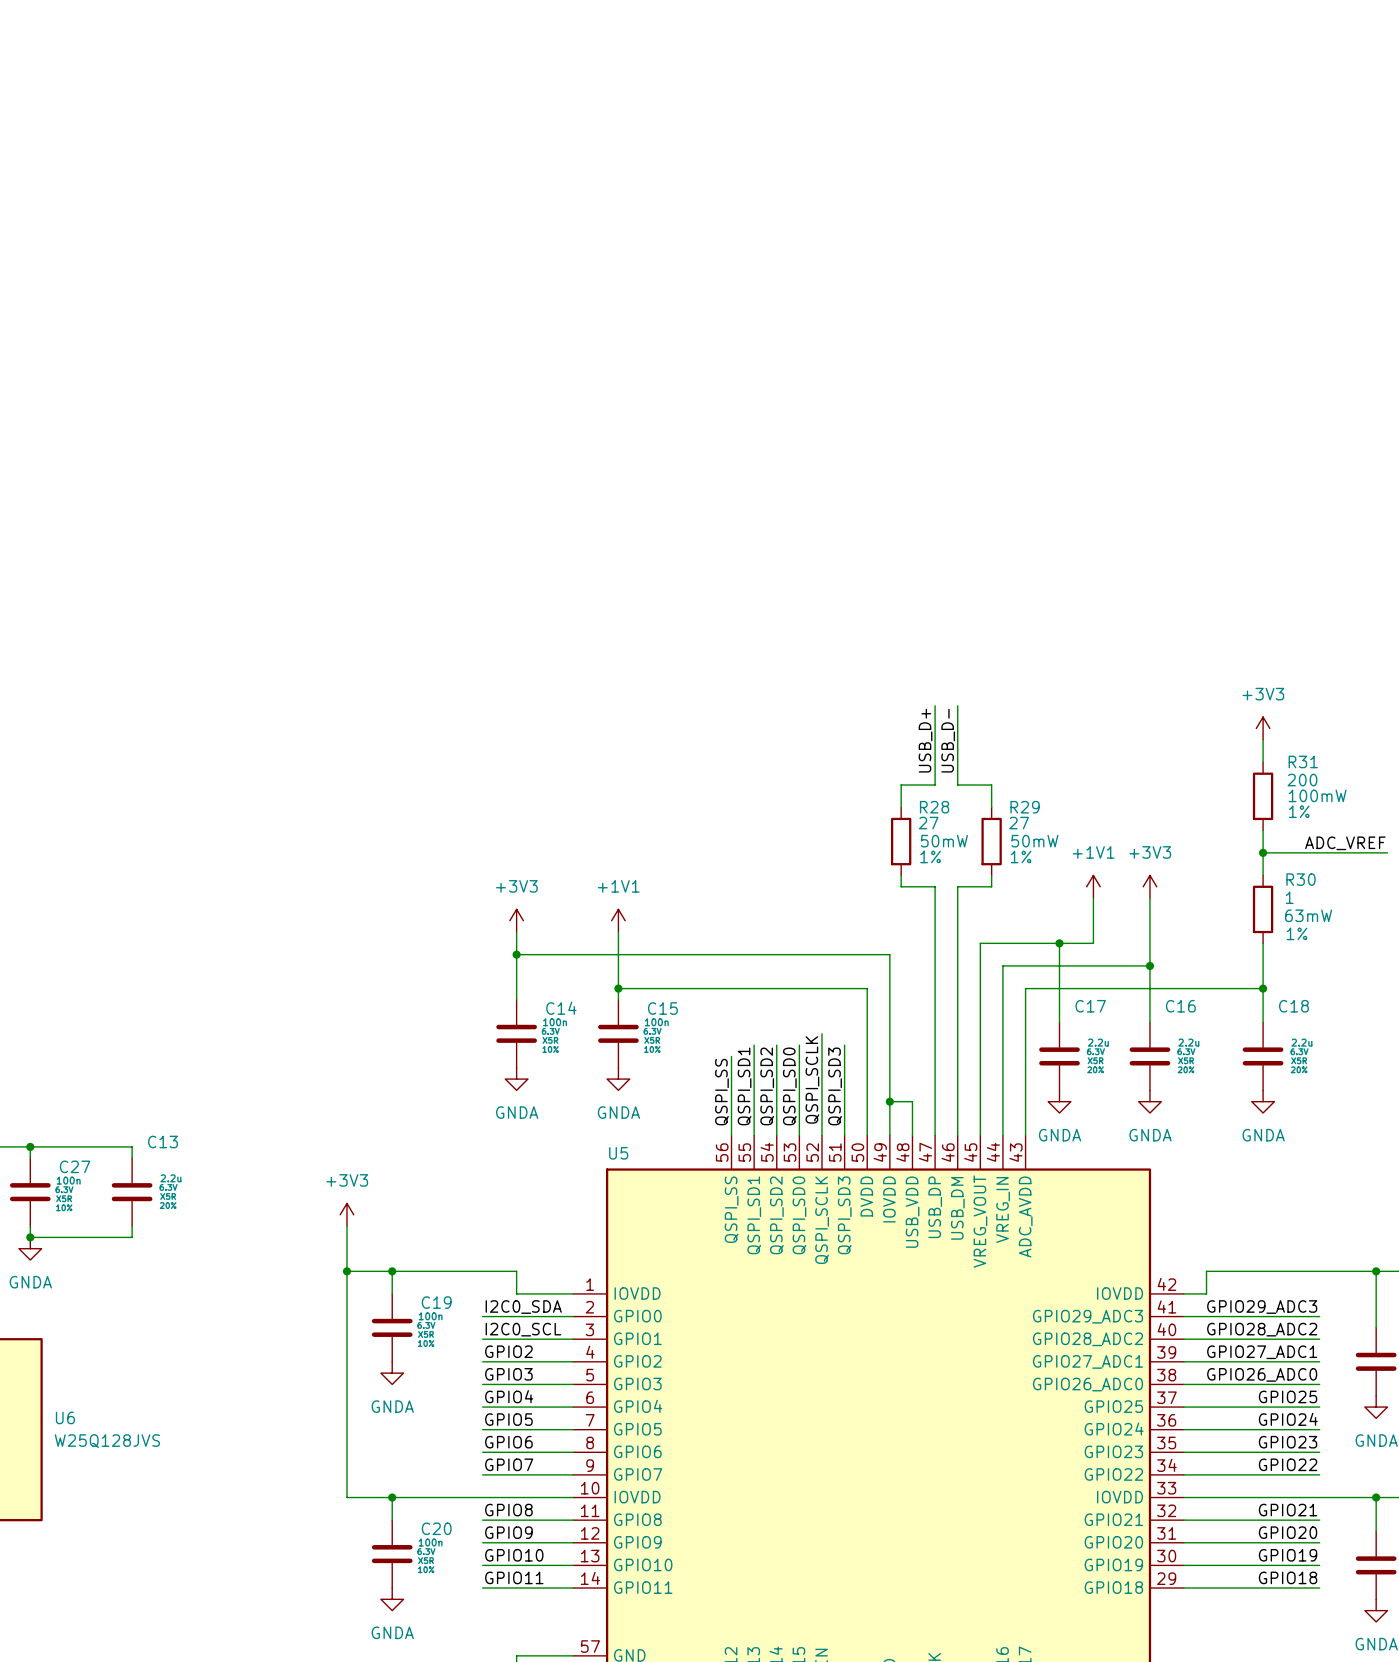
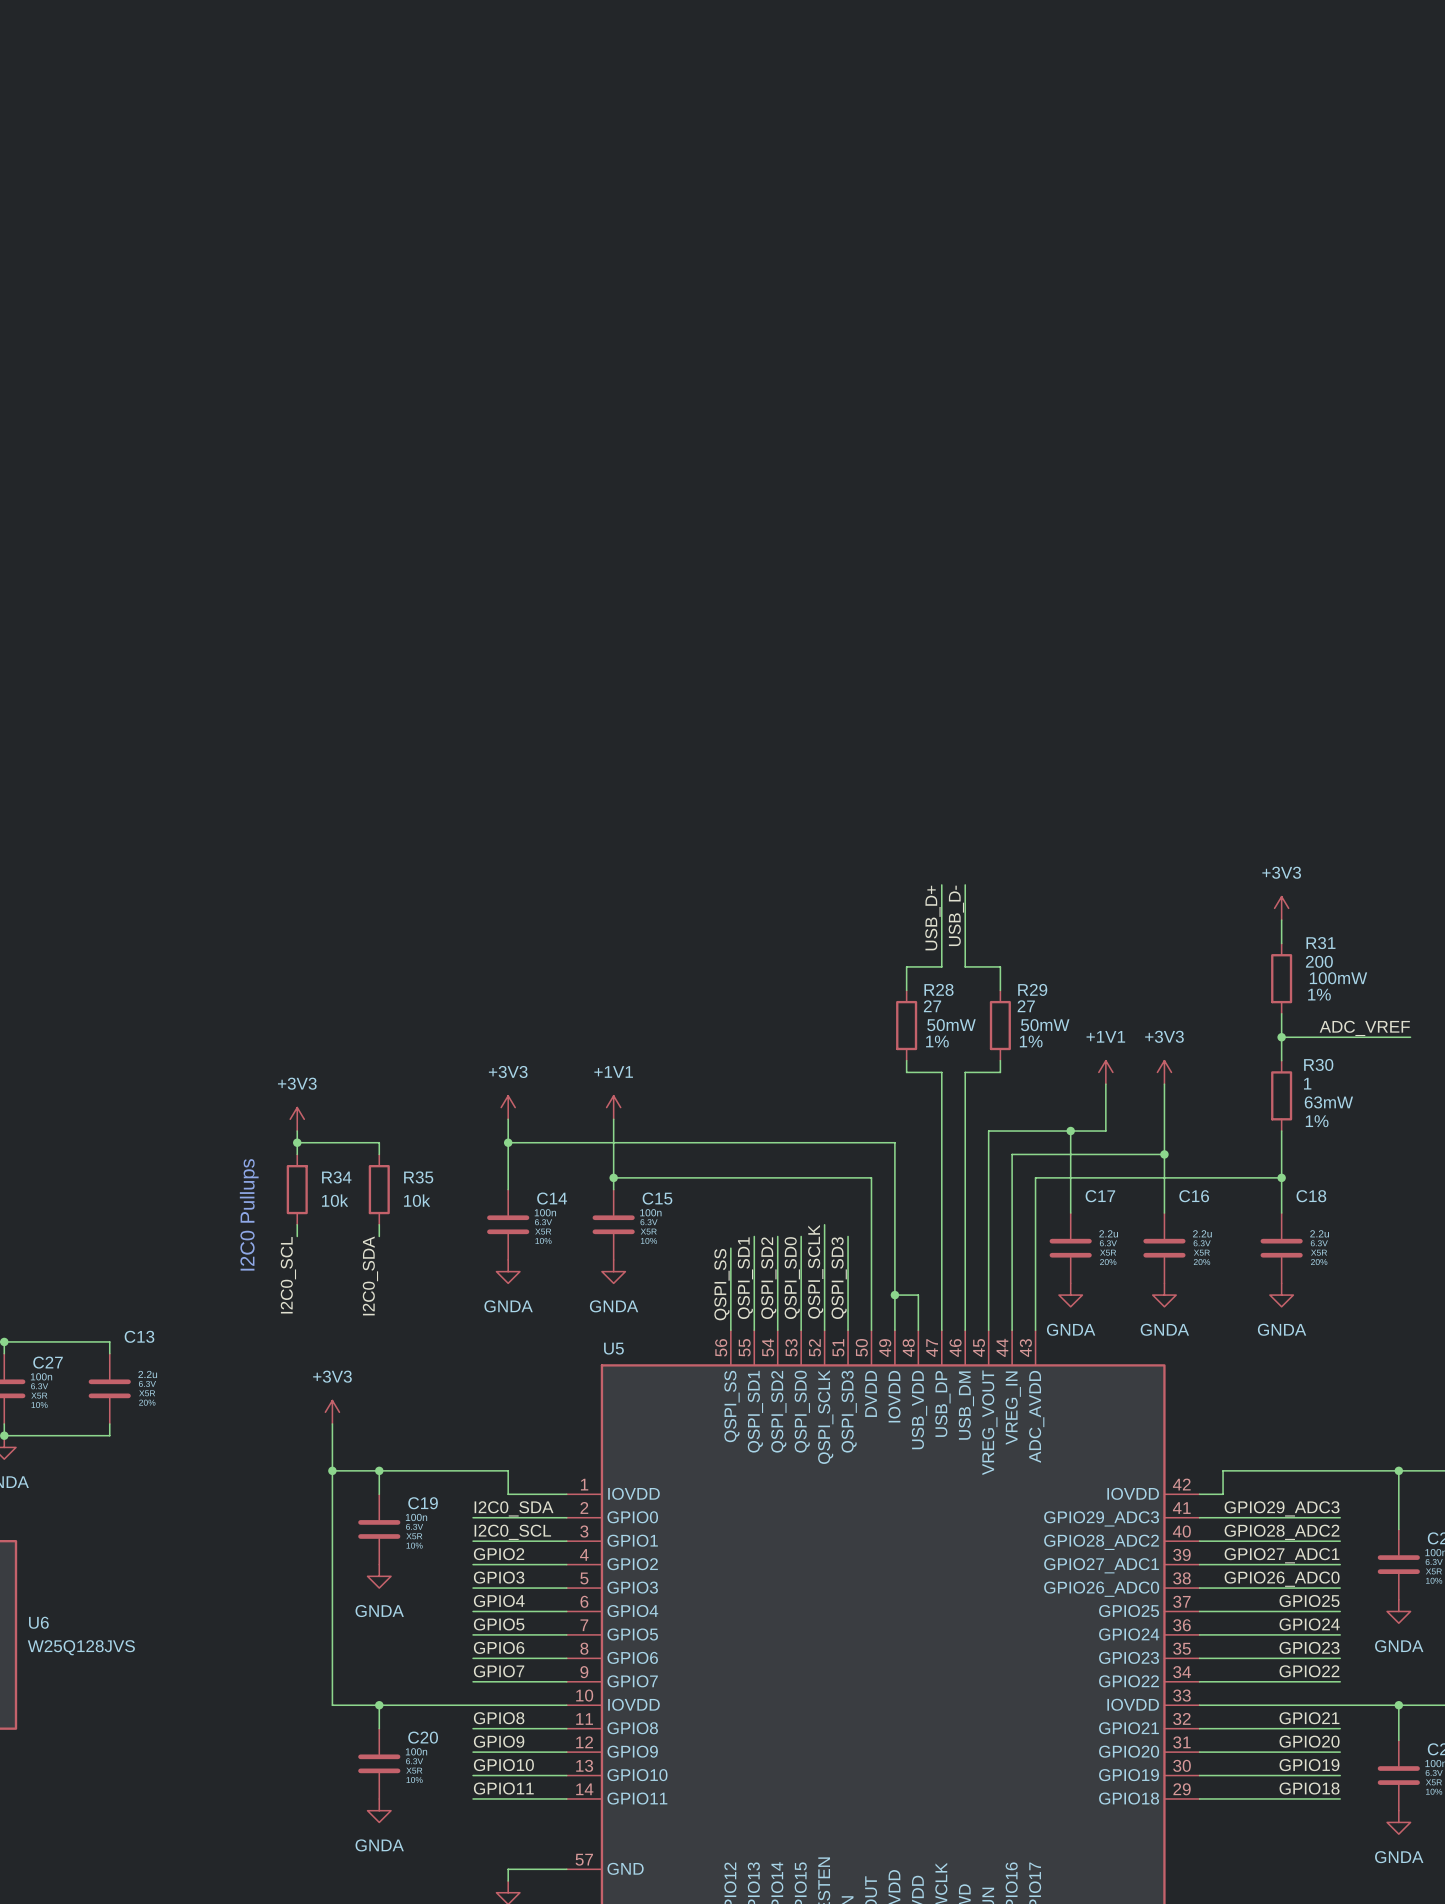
power symbol: none -> +3V3 (297, 1119)
wire: none -> (297, 1131) (297, 1154)
wire: none -> (297, 1142) (379, 1142) (379, 1154)
junction: none -> (297, 1142)
R34: none -> 10k (297, 1189)
R35: none -> 10k (379, 1189)
text: none -> I2C0 Pullups (249, 1214)
wire: none -> (297, 1224) (297, 1236)
wire: none -> (379, 1224) (379, 1236)
label: none -> I2C0_SCL (288, 1275)
label: none -> I2C0_SDA (370, 1275)

